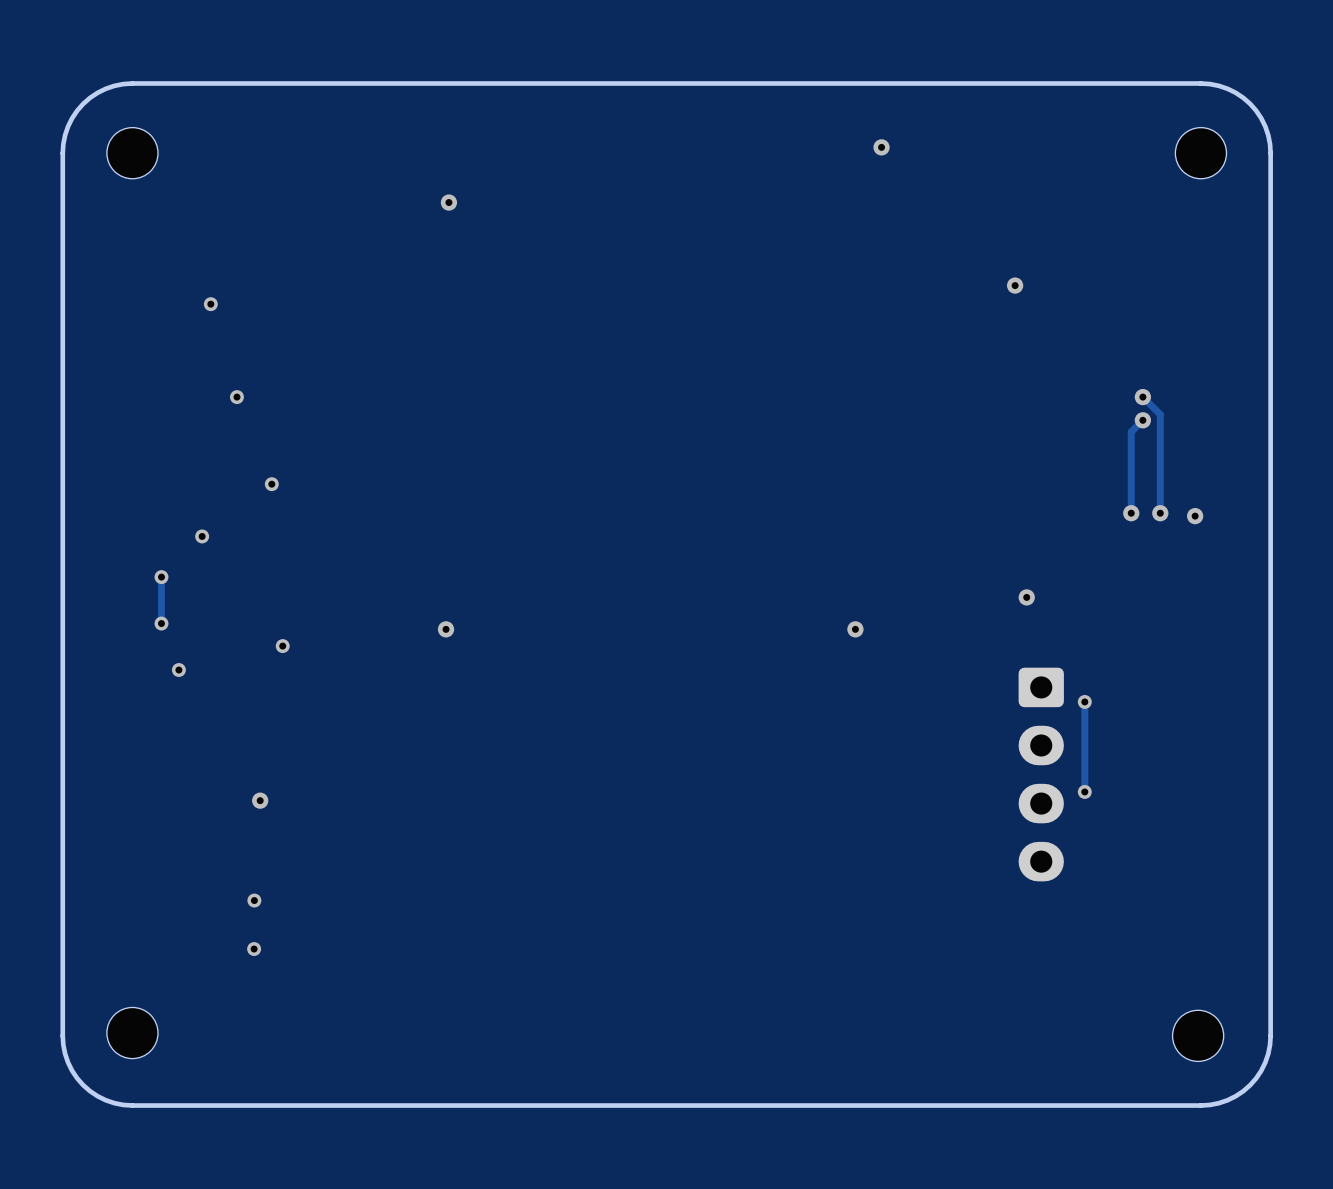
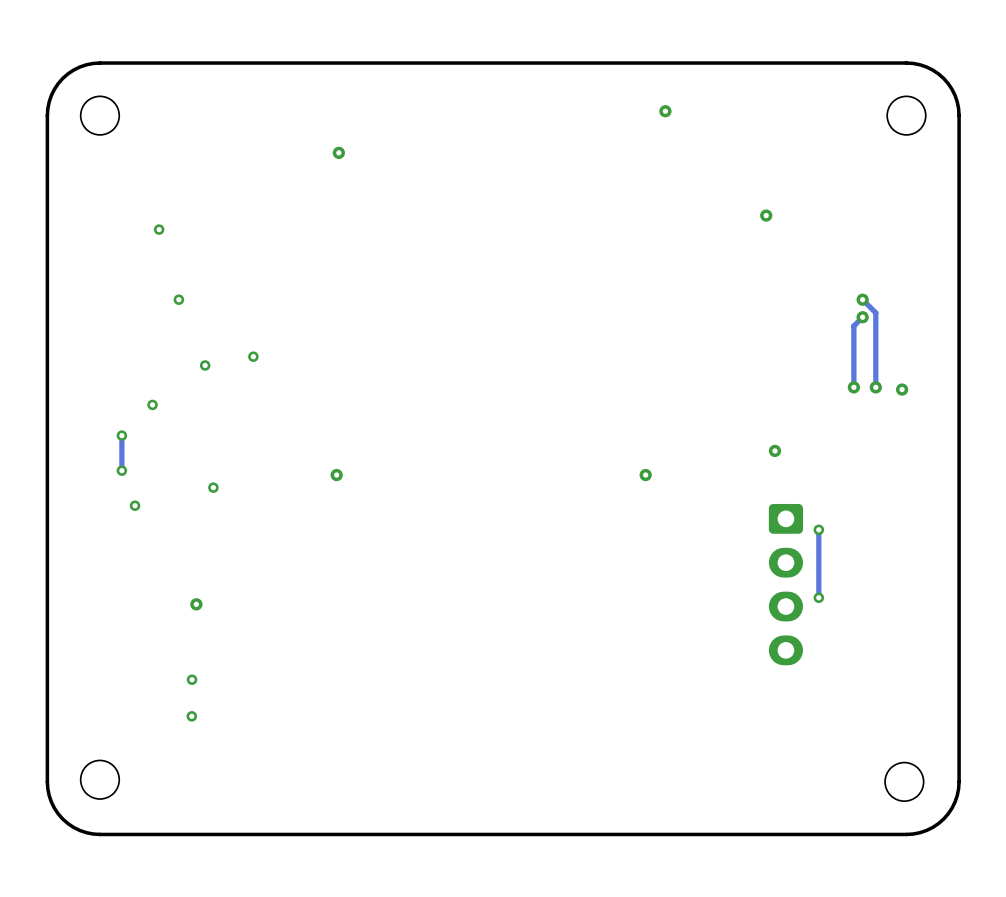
via: none -> (253, 356)

